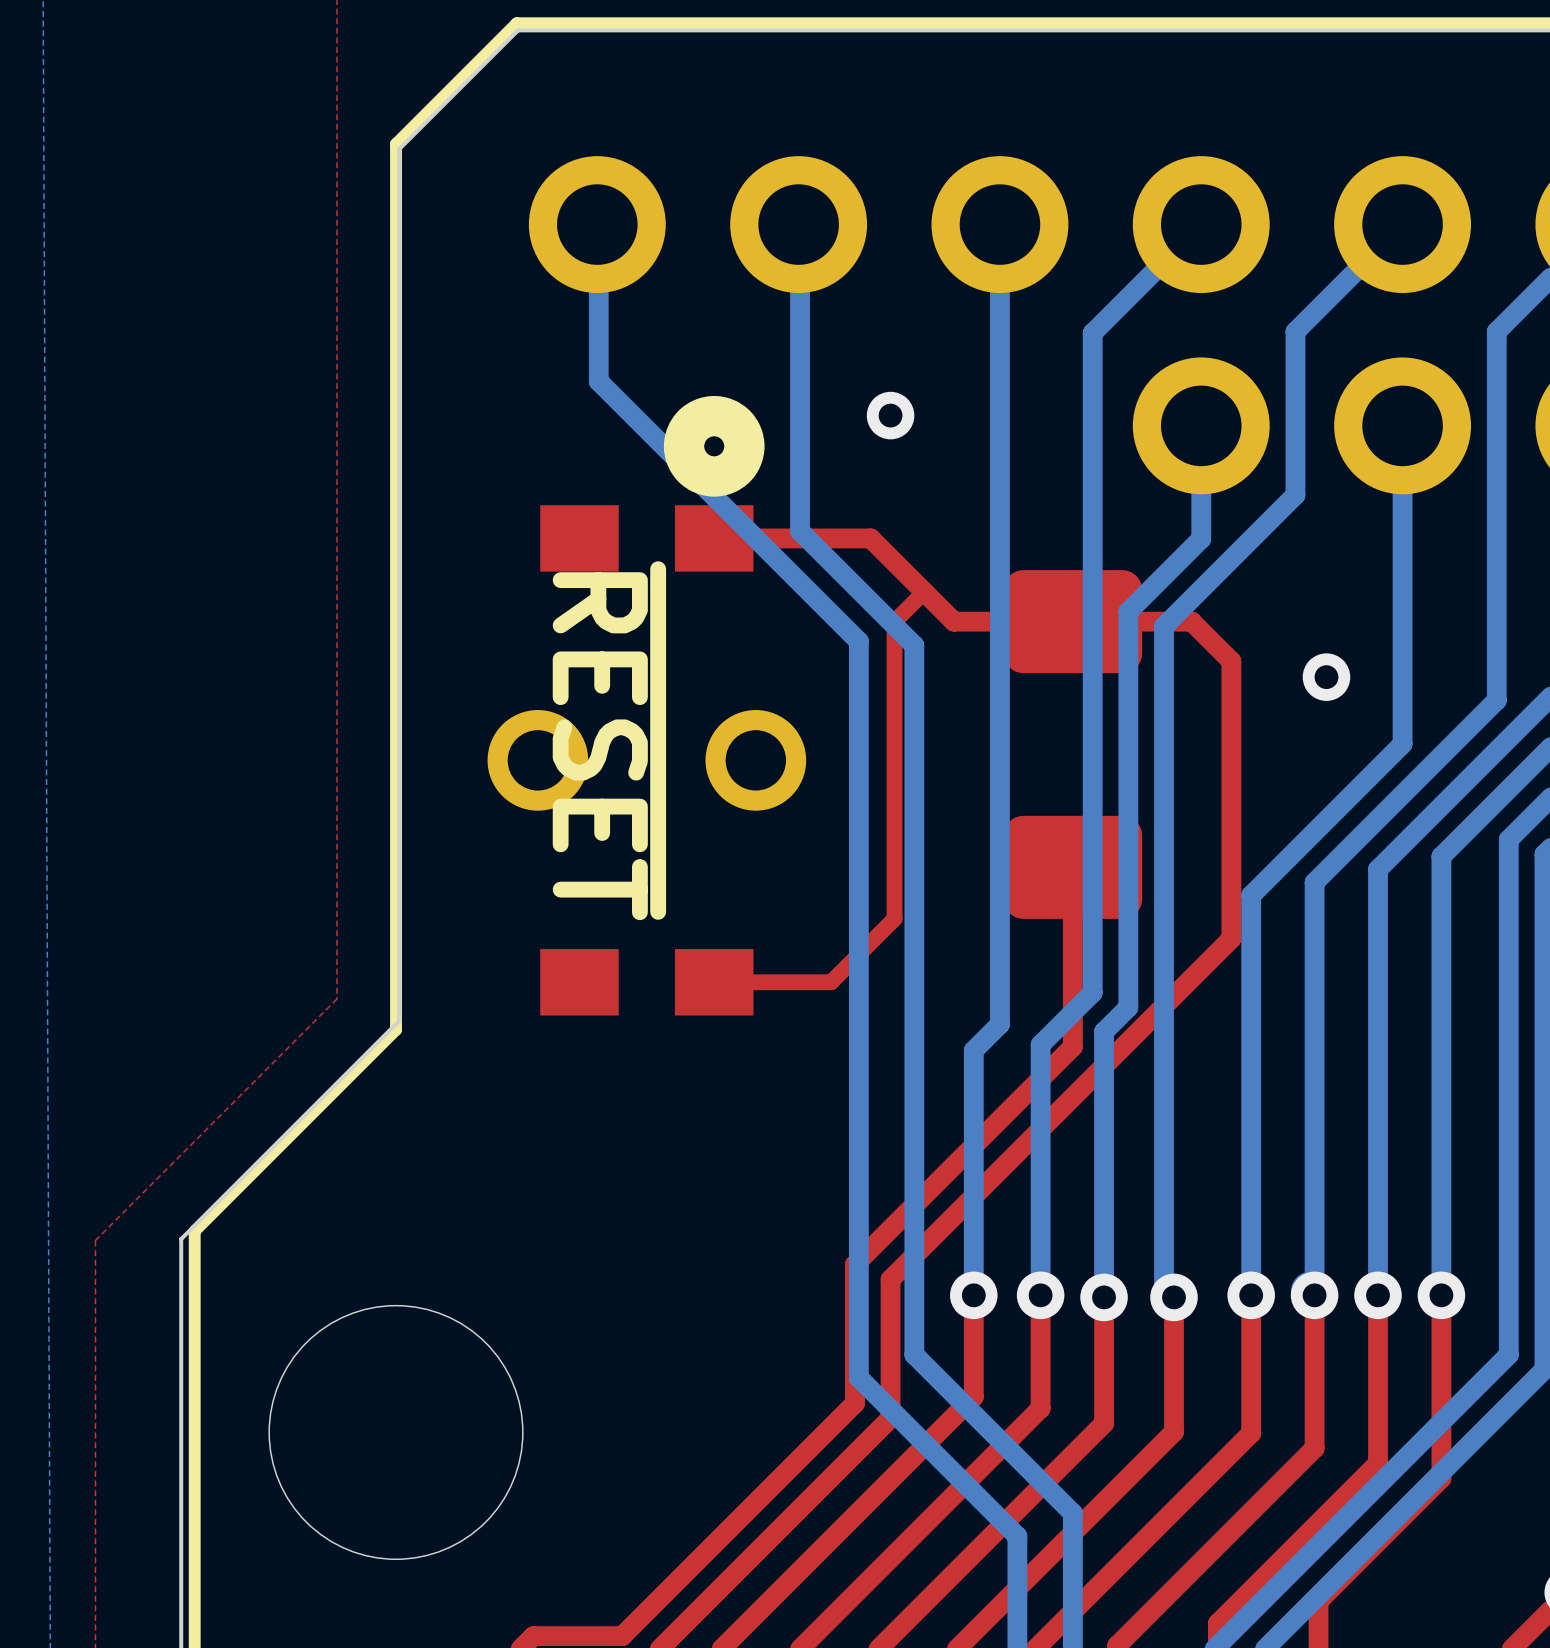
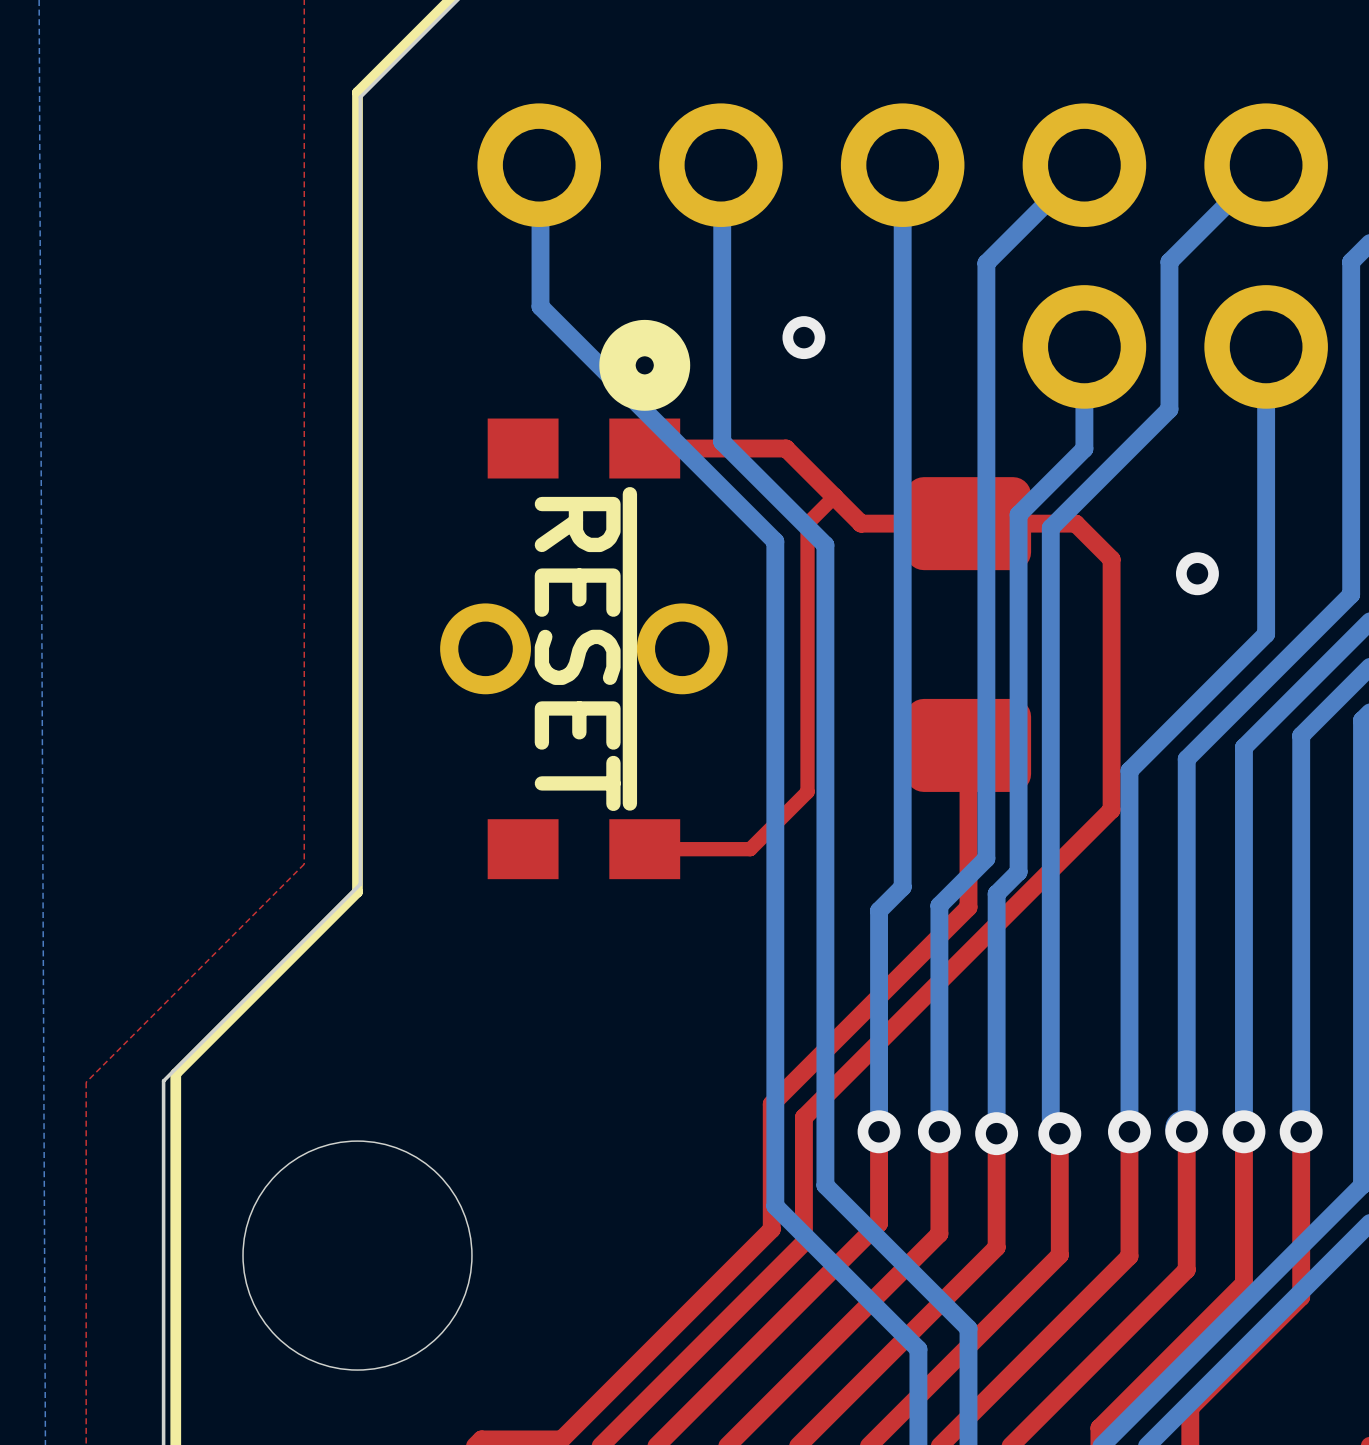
~{RESET} name position: ~{RESET} (609, 740) -> ~{RESET} (585, 649)

